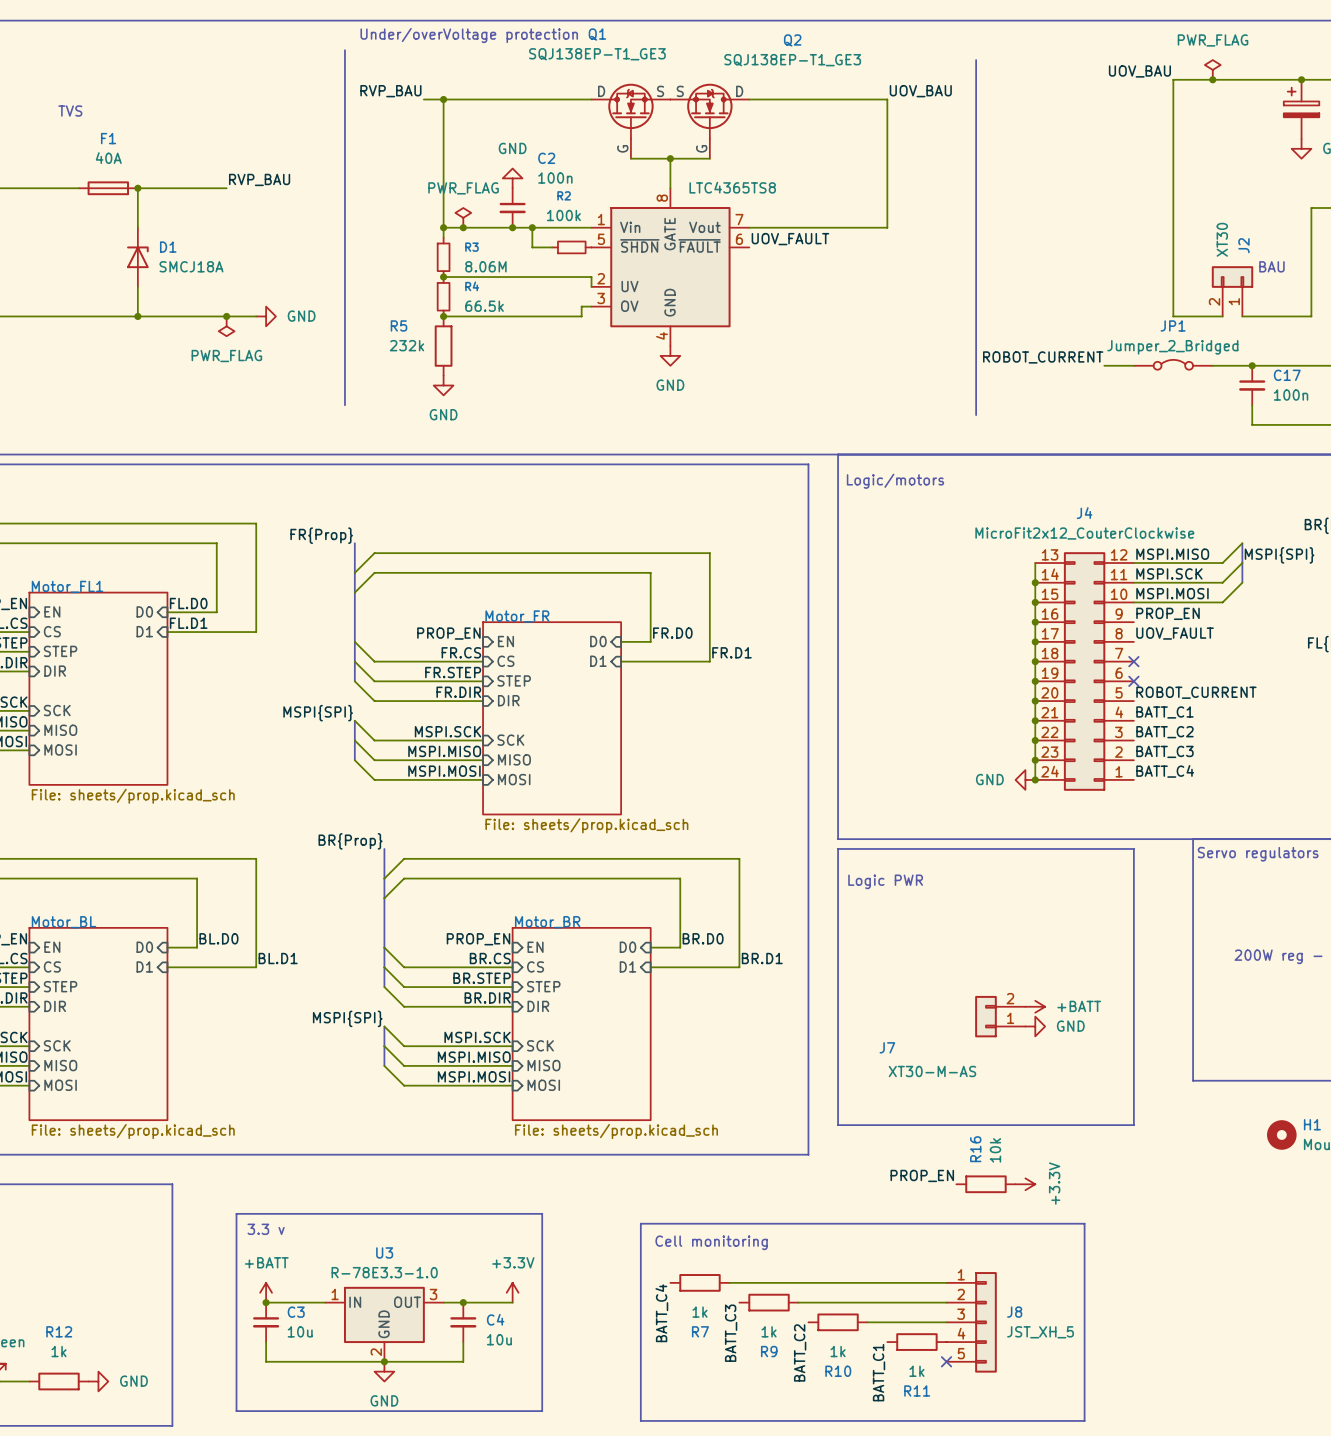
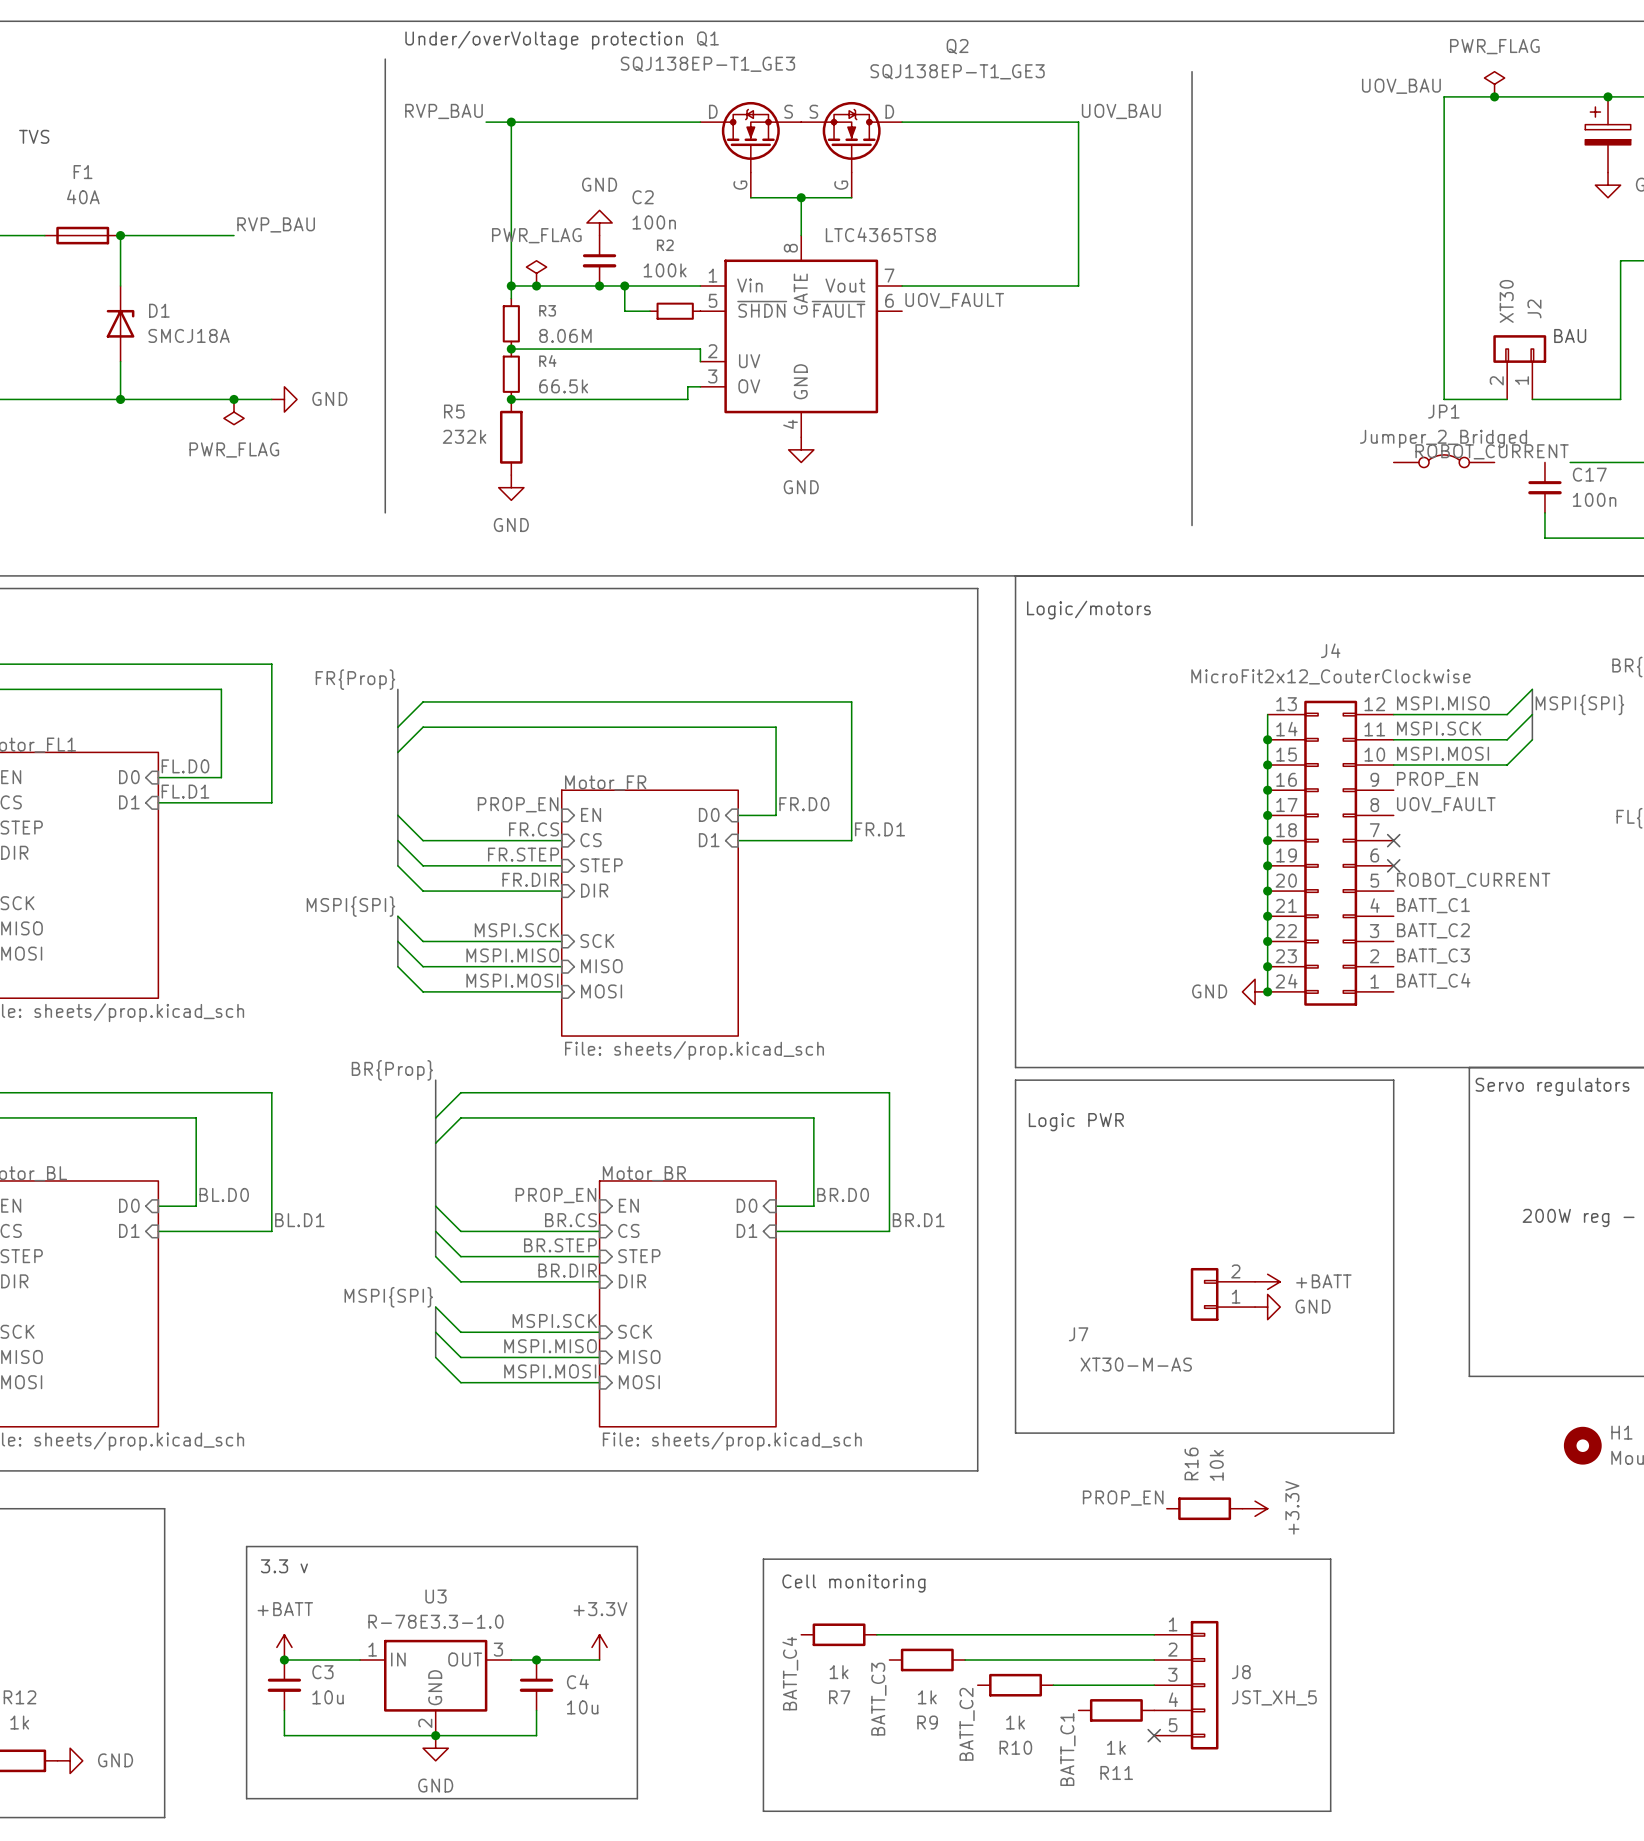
label position: ROBOT_CURRENT (1043, 357) -> ROBOT_CURRENT (1492, 451)
wire: (1104, 365) (1133, 365) -> none
wire: (1212, 365) (1271, 365) -> none
junction: (1252, 365) -> none

